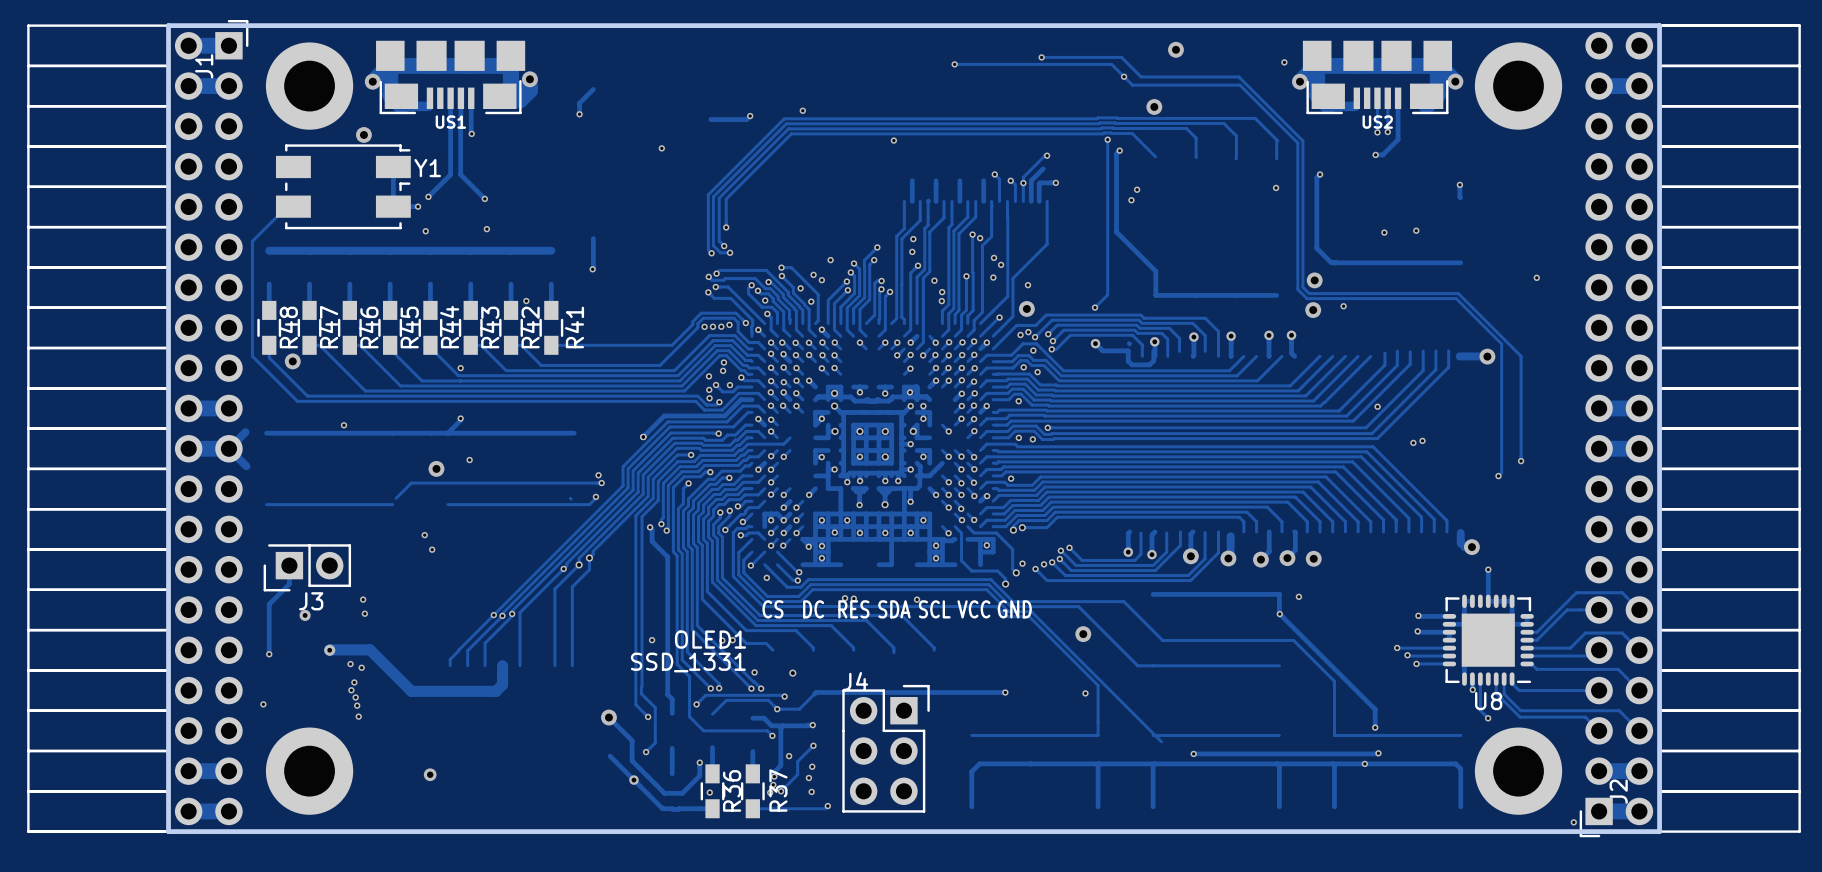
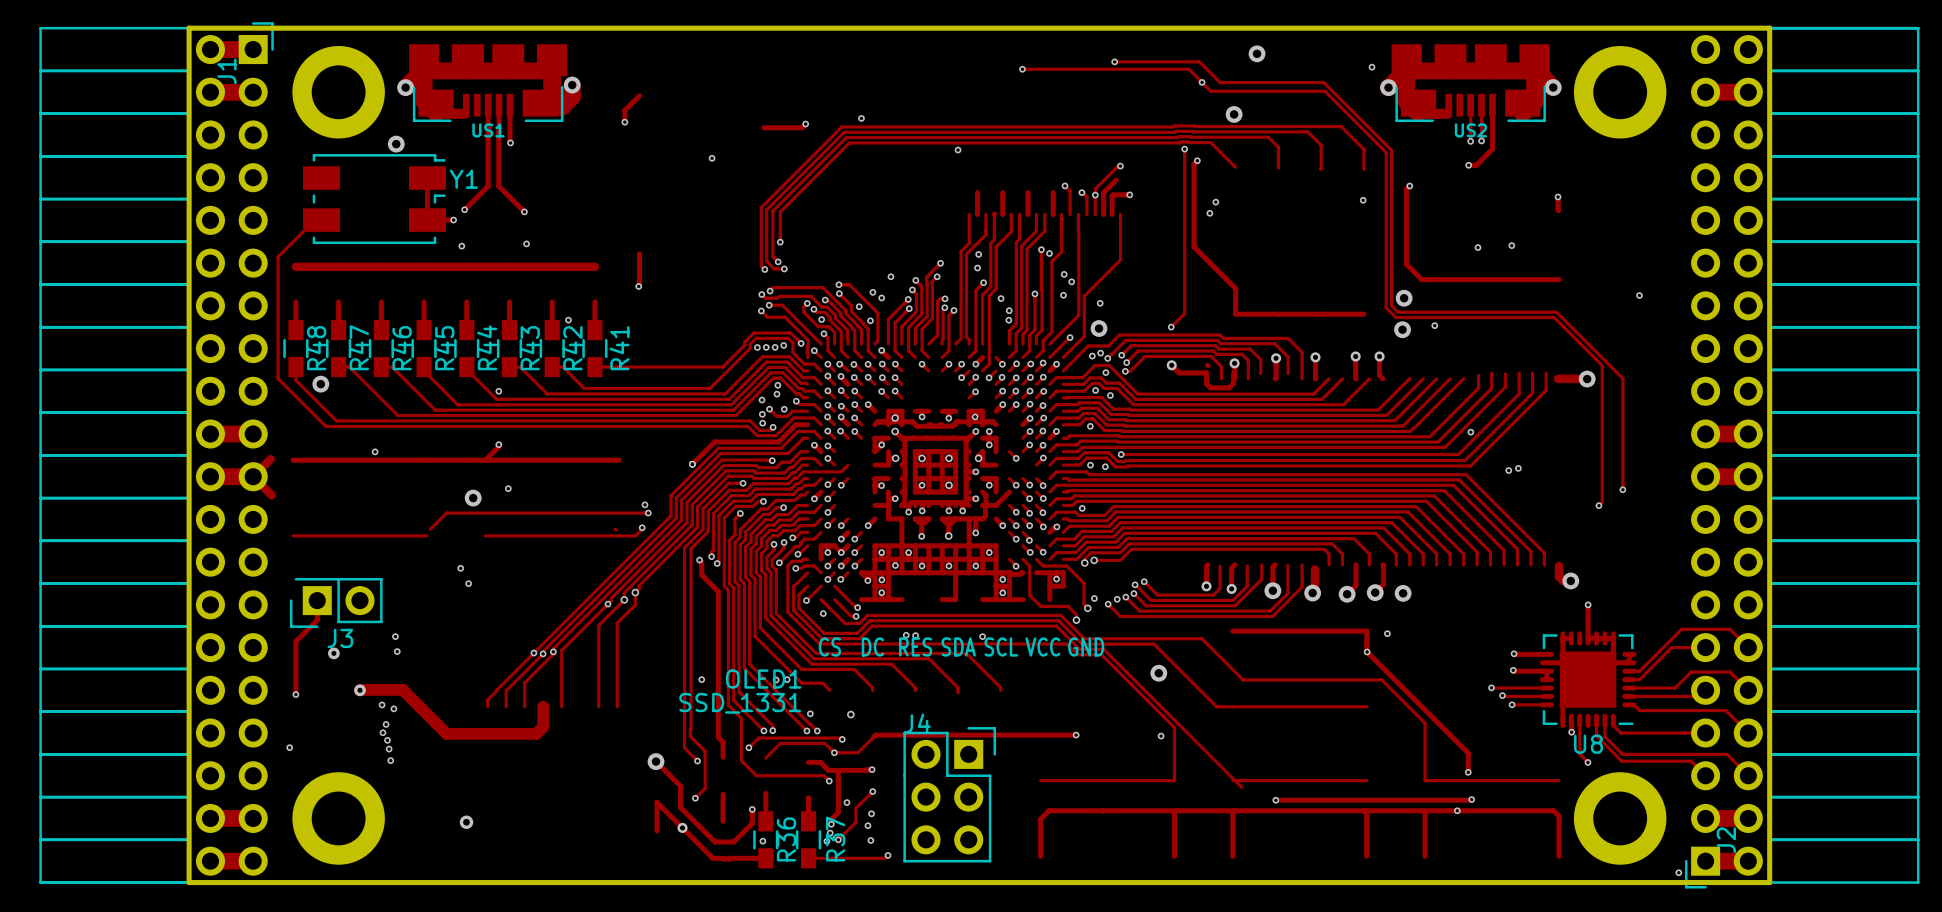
track: none -> (657, 802) (657, 830)

